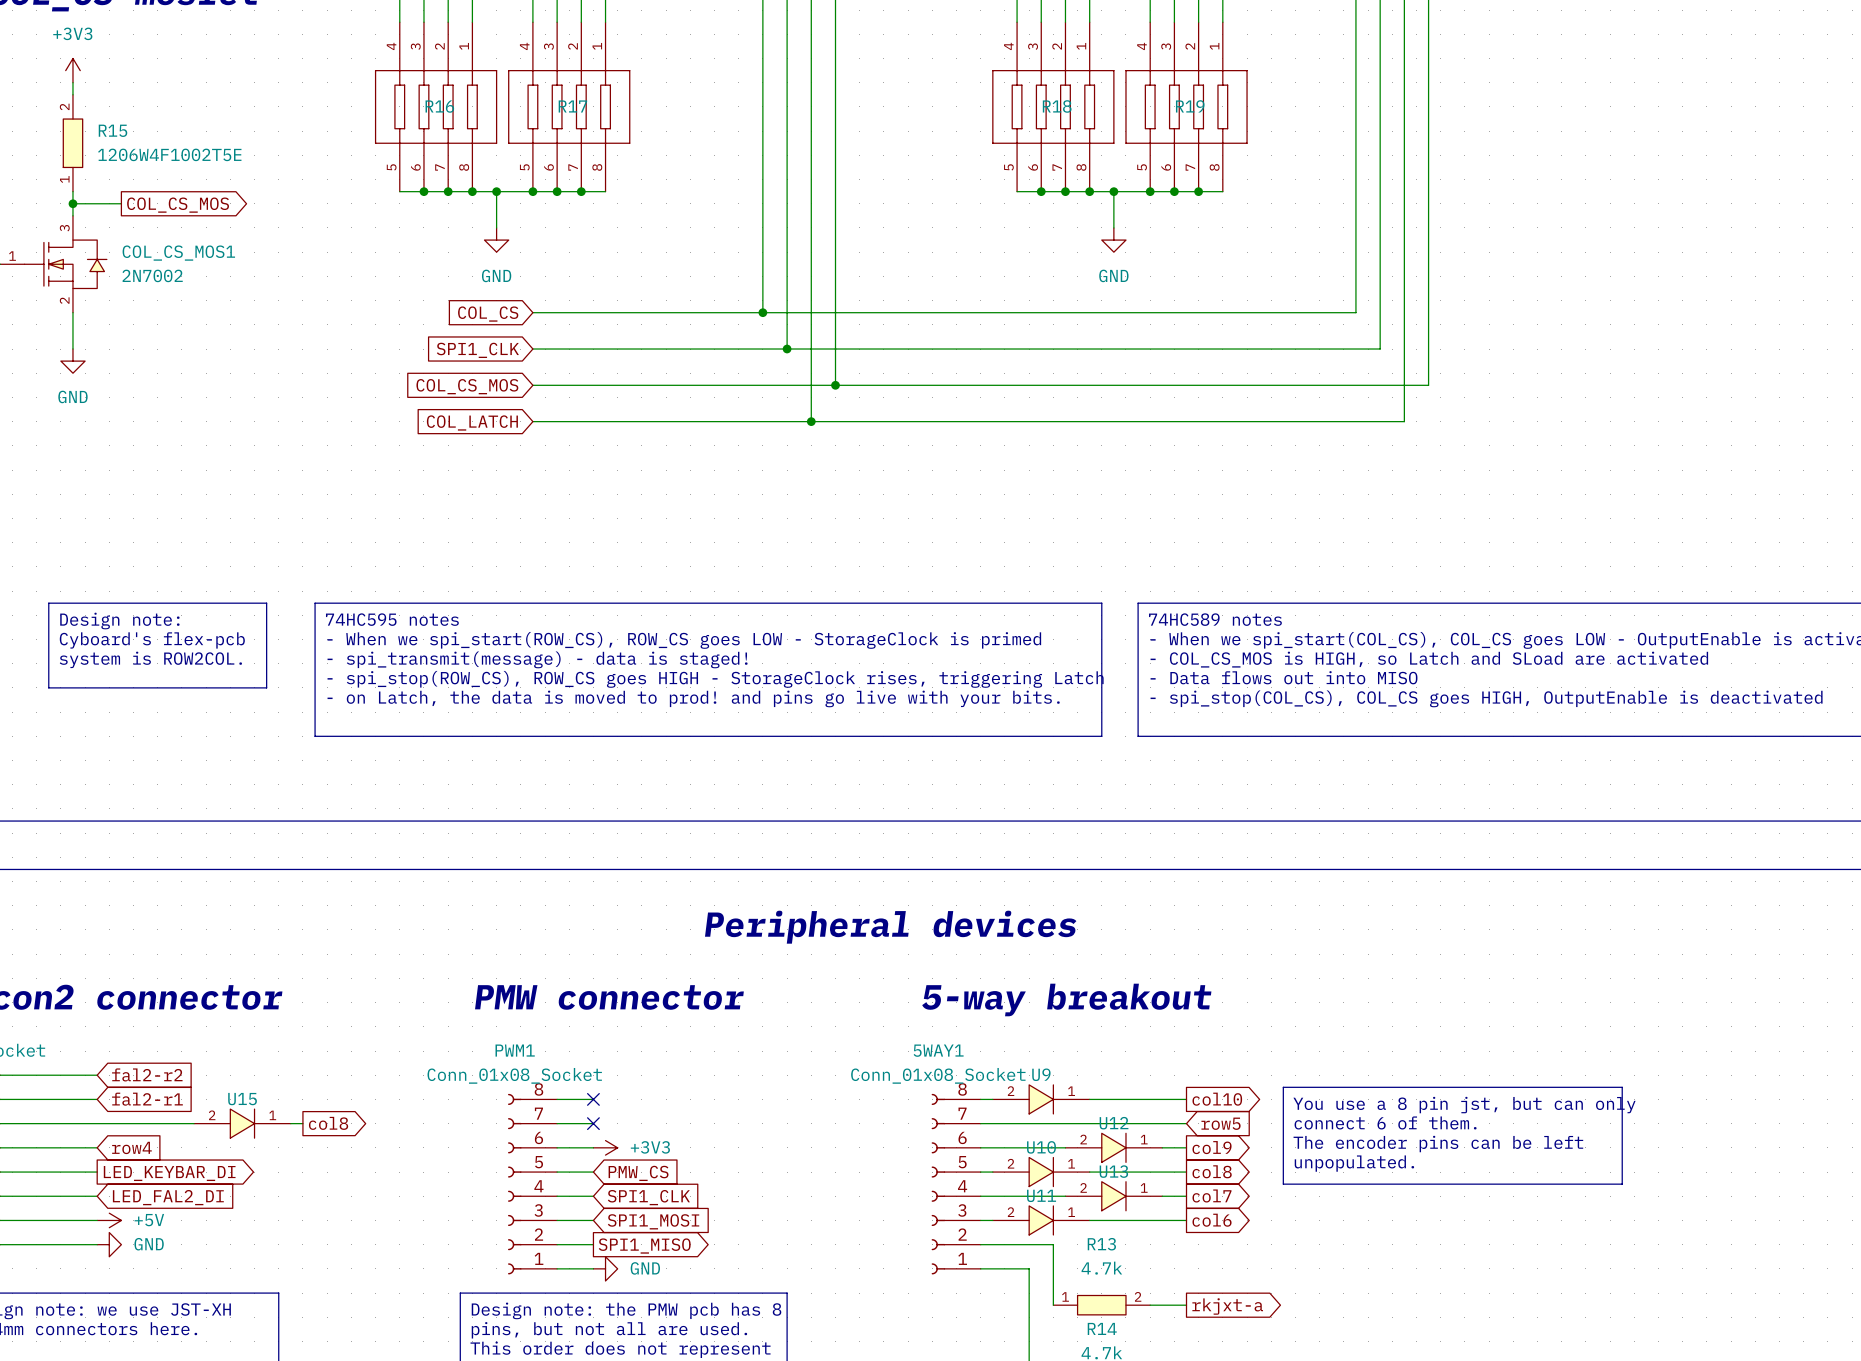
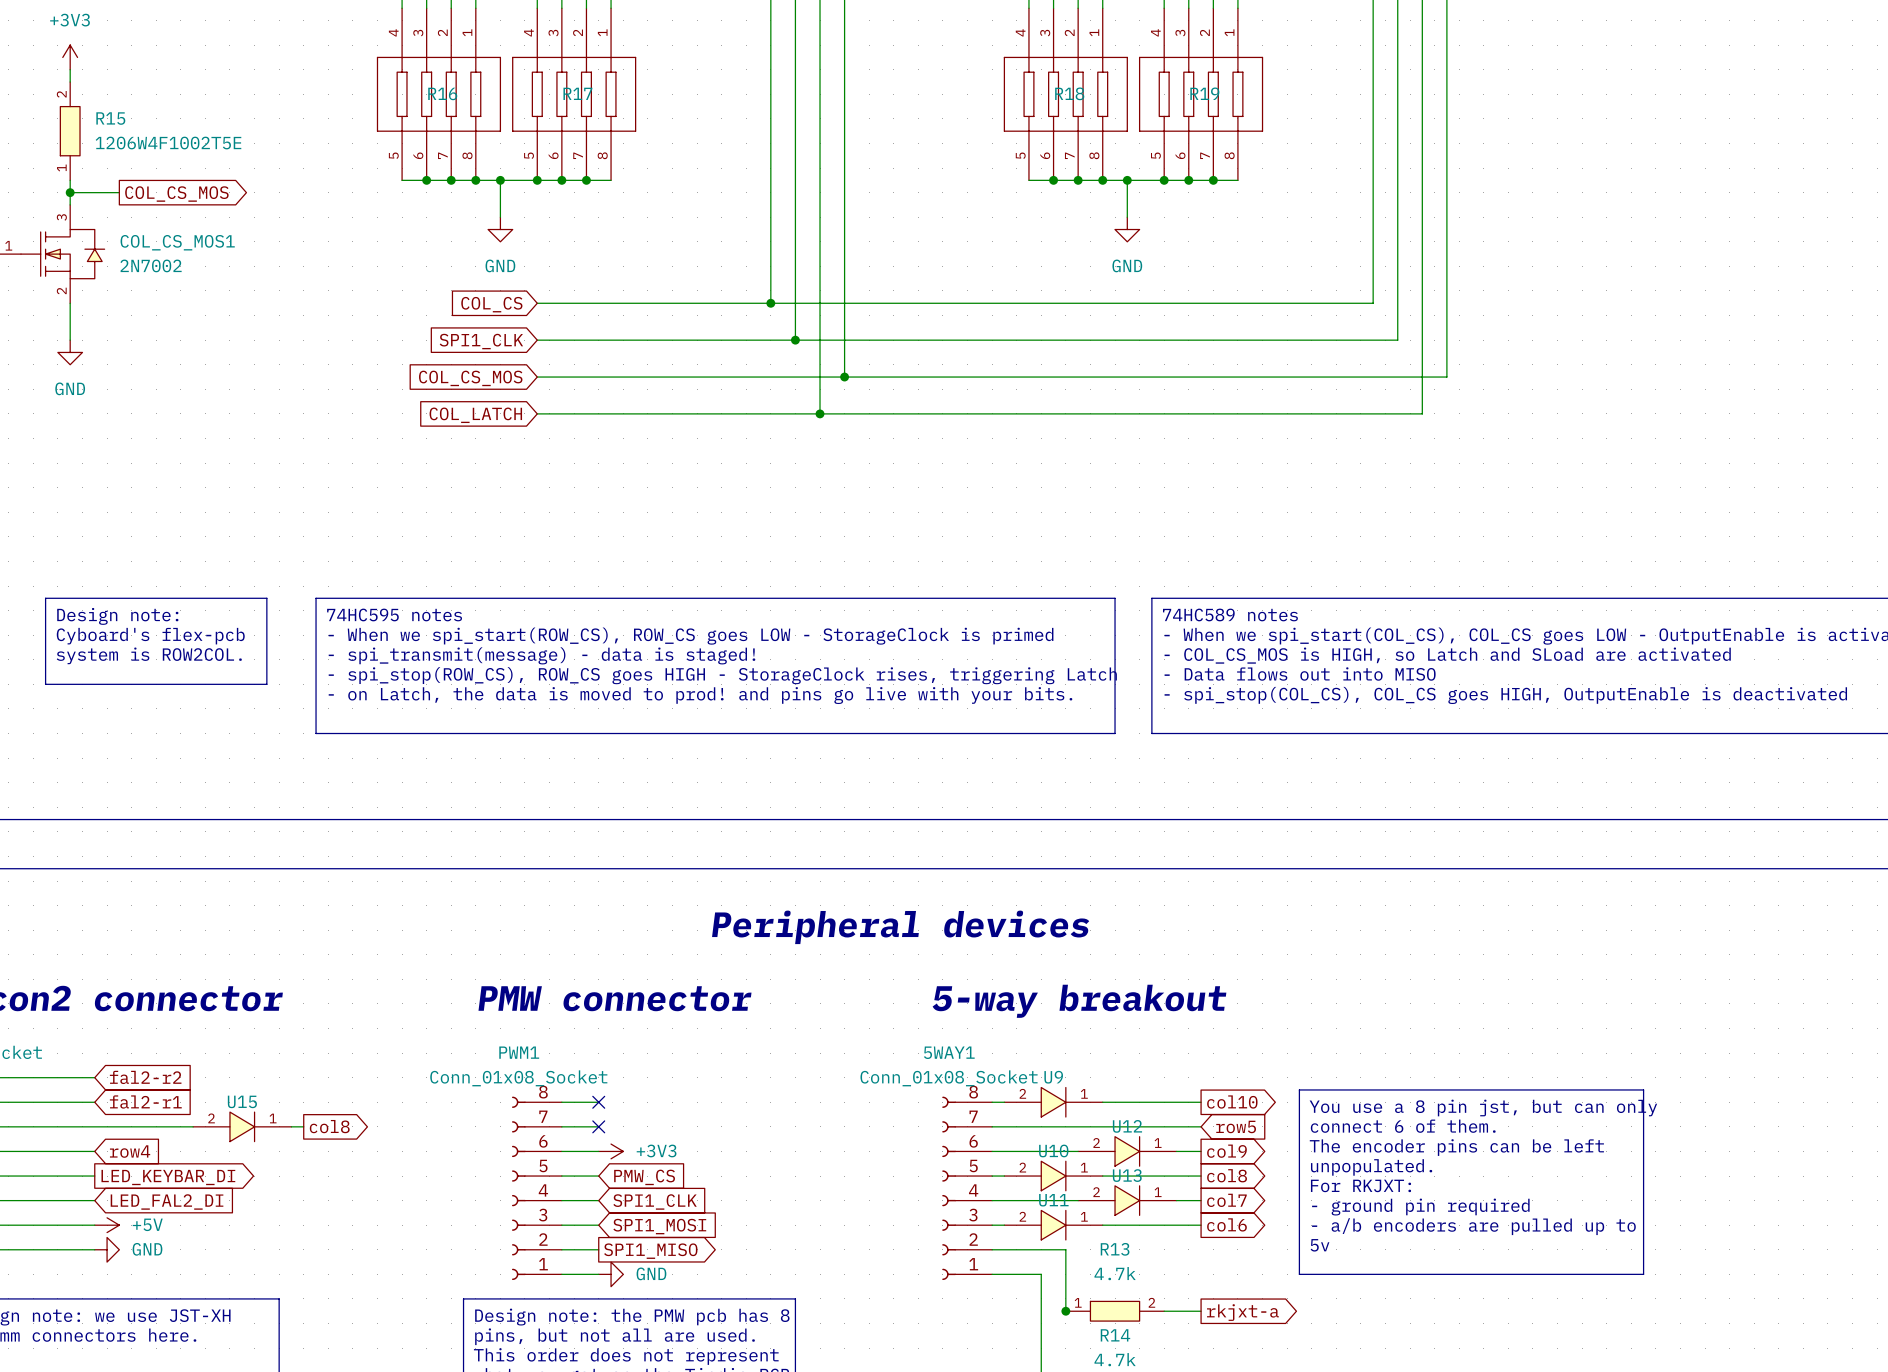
text: none -> For RKJXT: (1360, 1185)
line: (1283, 1184) (1622, 1184) -> (1299, 1188) (1299, 1274) (1643, 1274) (1643, 1188)
text: none -> - ground pin required (1420, 1207)
text: none -> - a/b encoders are pulled up to (1473, 1226)
text: none -> 5v (1320, 1245)
junction: none -> (1065, 1311)

